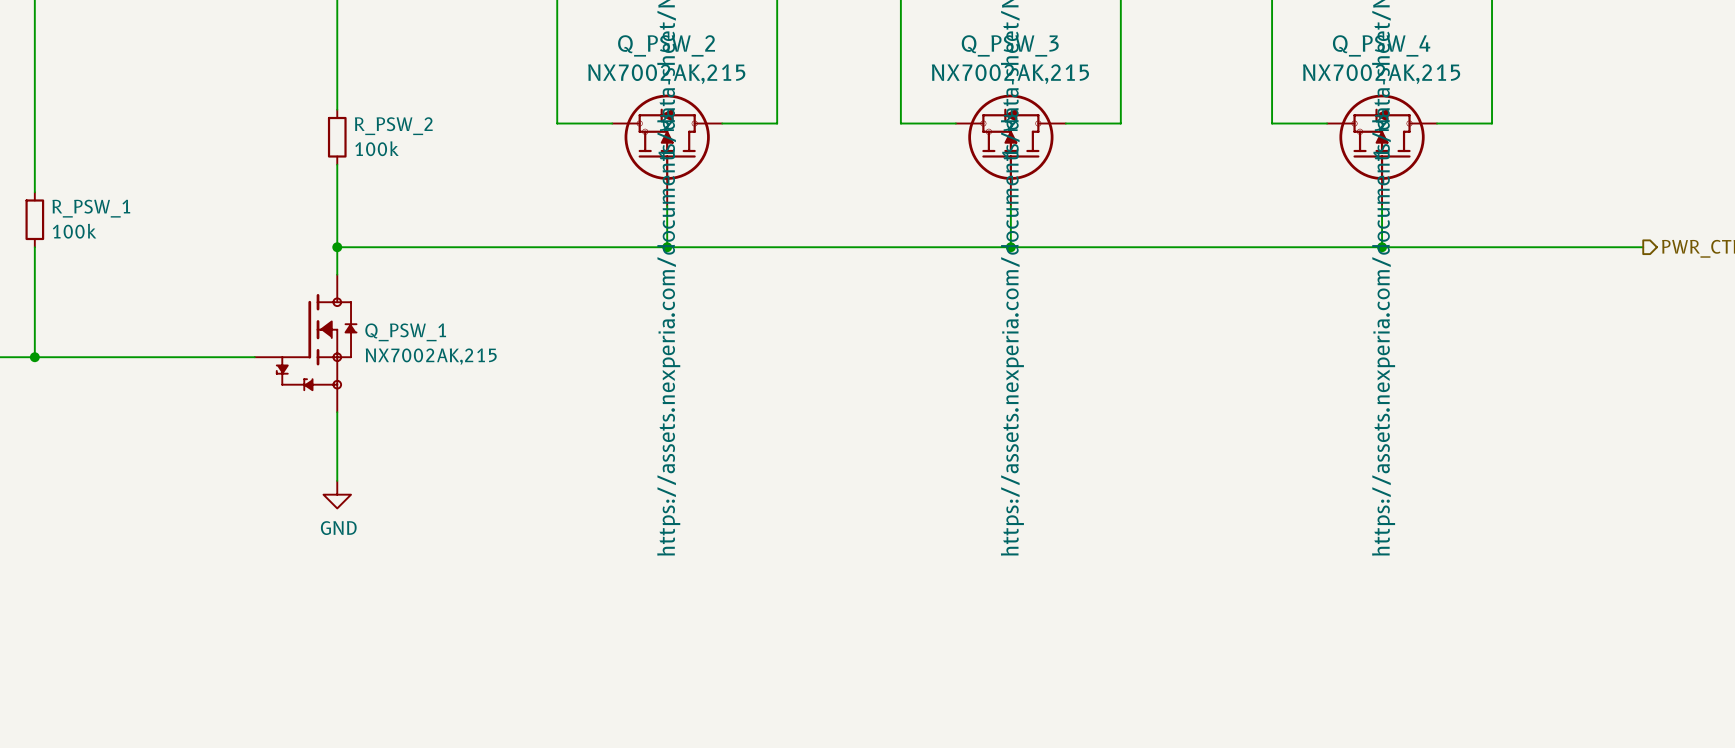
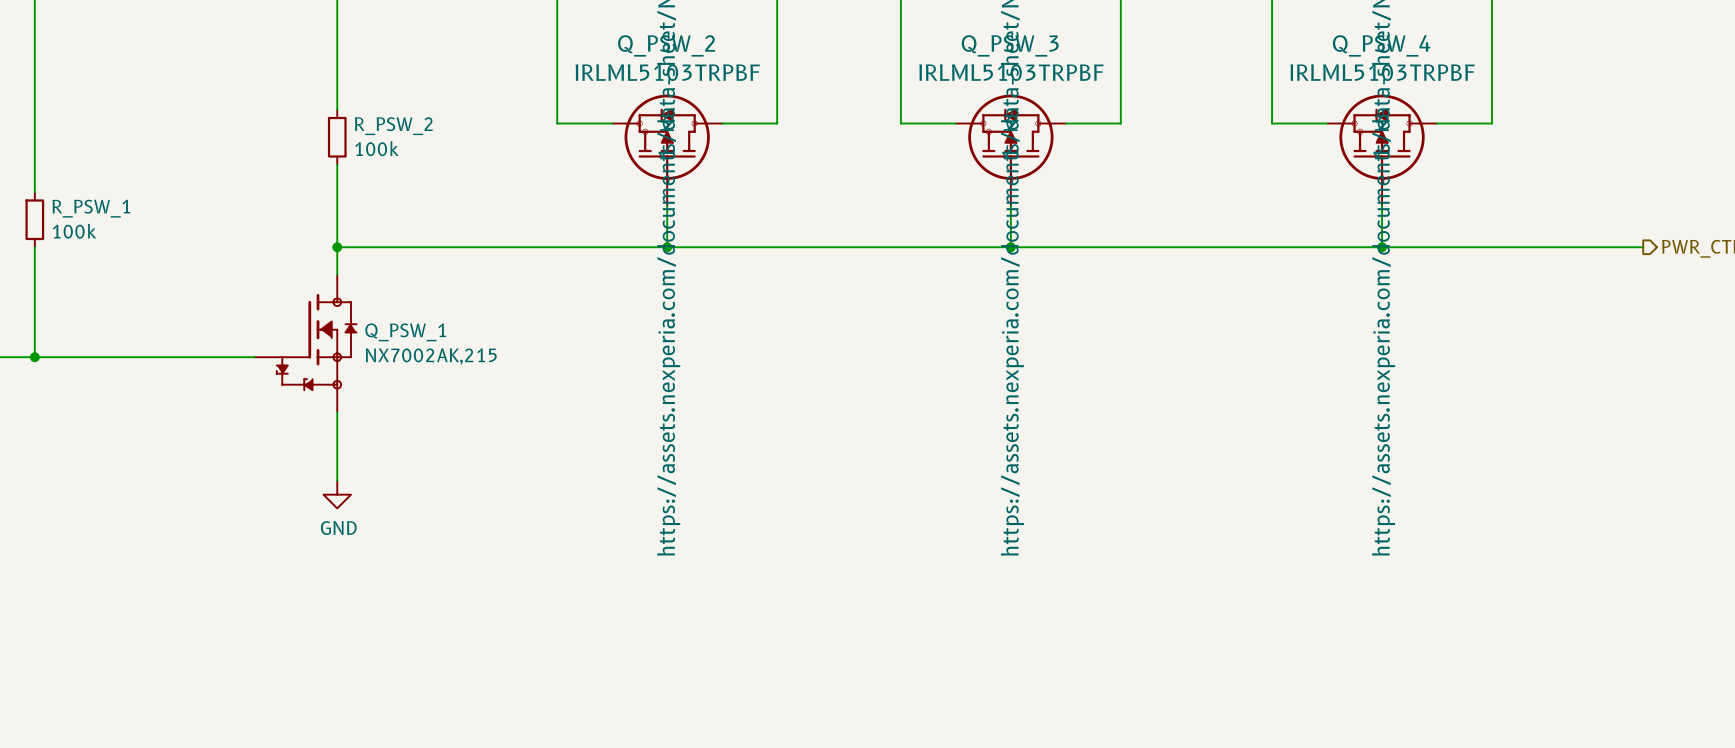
Q_PSW_2 value: NX7002AK,215 (666, 74) -> IRLML5103TRPBF (667, 72)
Q_PSW_3 value: NX7002AK,215 (1010, 74) -> IRLML5103TRPBF (1011, 72)
Q_PSW_4 value: NX7002AK,215 (1381, 74) -> IRLML5103TRPBF (1382, 72)

